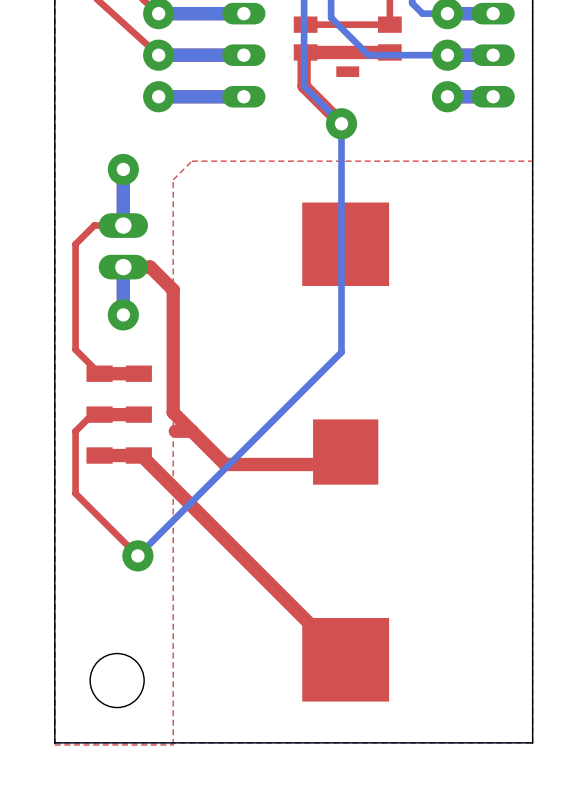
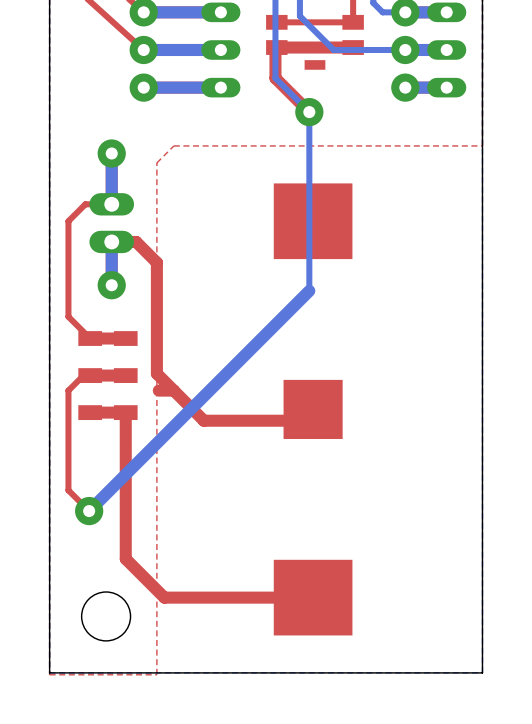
bottom track: (341, 321) (341, 352) (137, 555) -> (309, 290) (89, 511)
top track: (138, 455) (141, 455) (345, 659) -> (125, 412) (125, 558) (164, 597) (313, 597)
top track: (75, 493) (137, 555) -> (68, 447) (68, 490) (89, 511)
via position: (137, 555) -> (89, 511)

